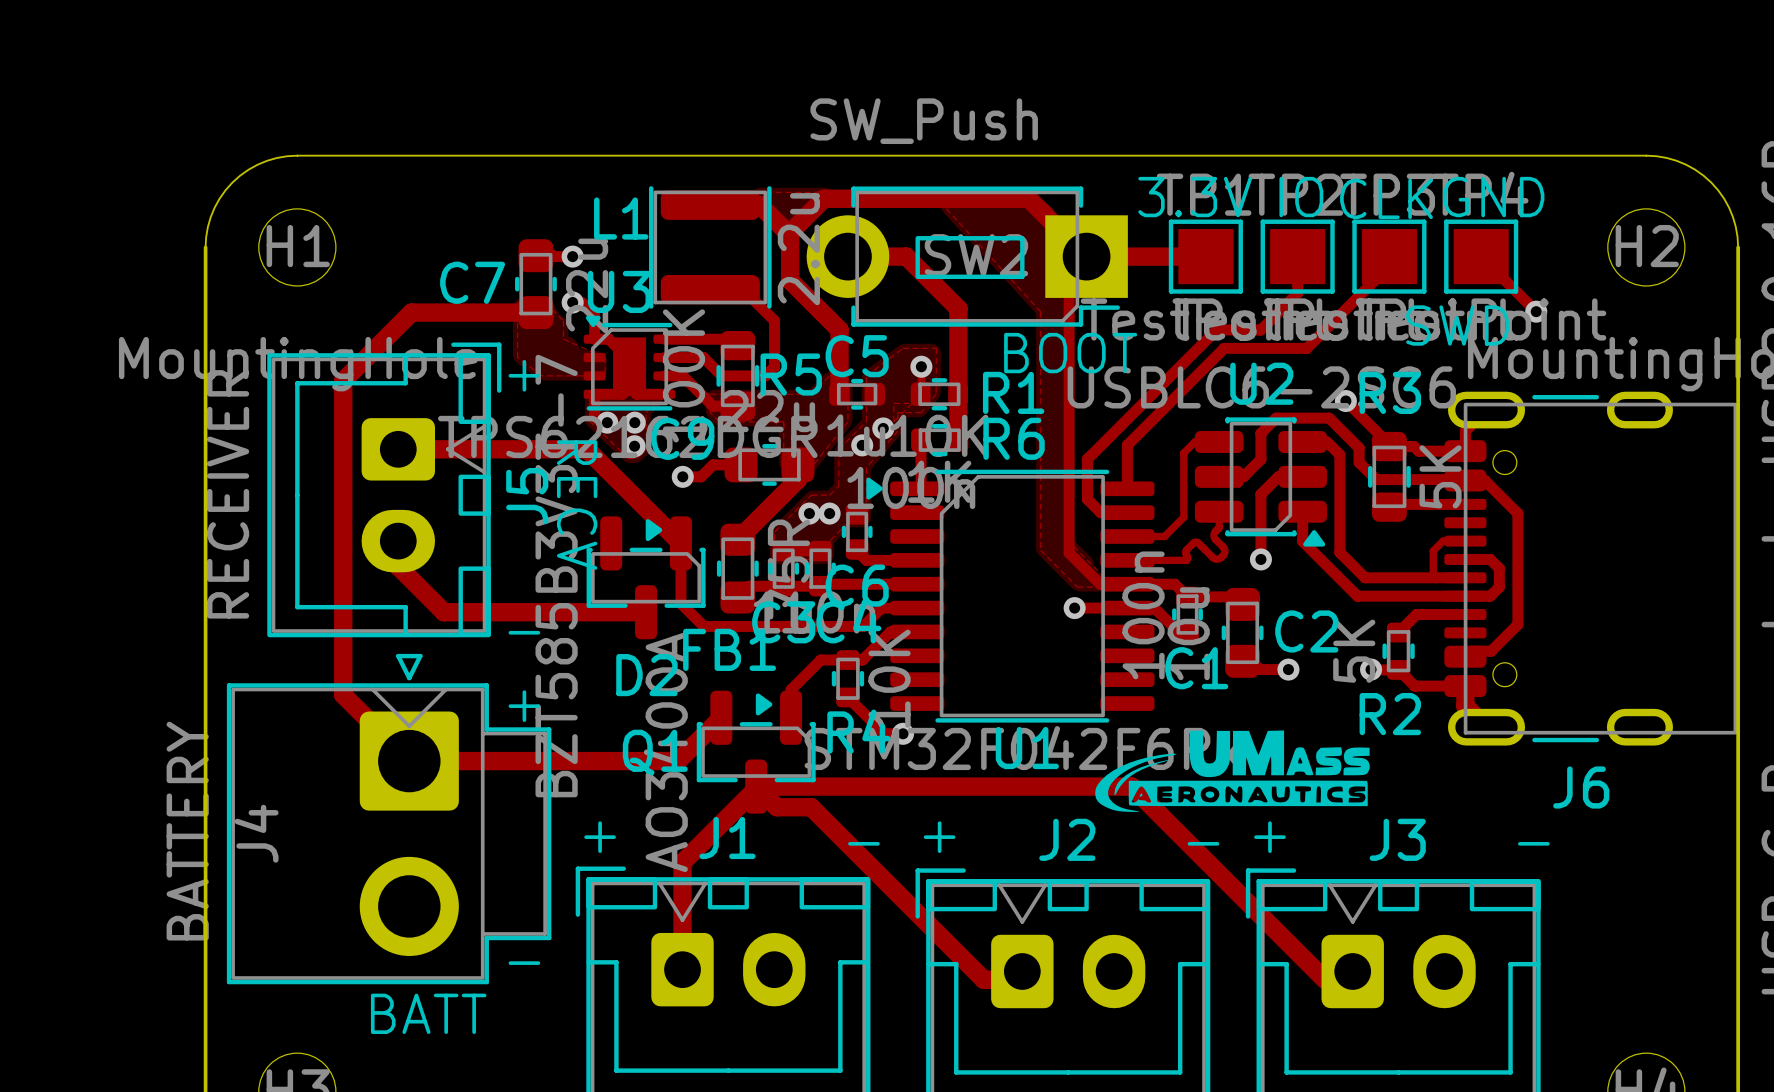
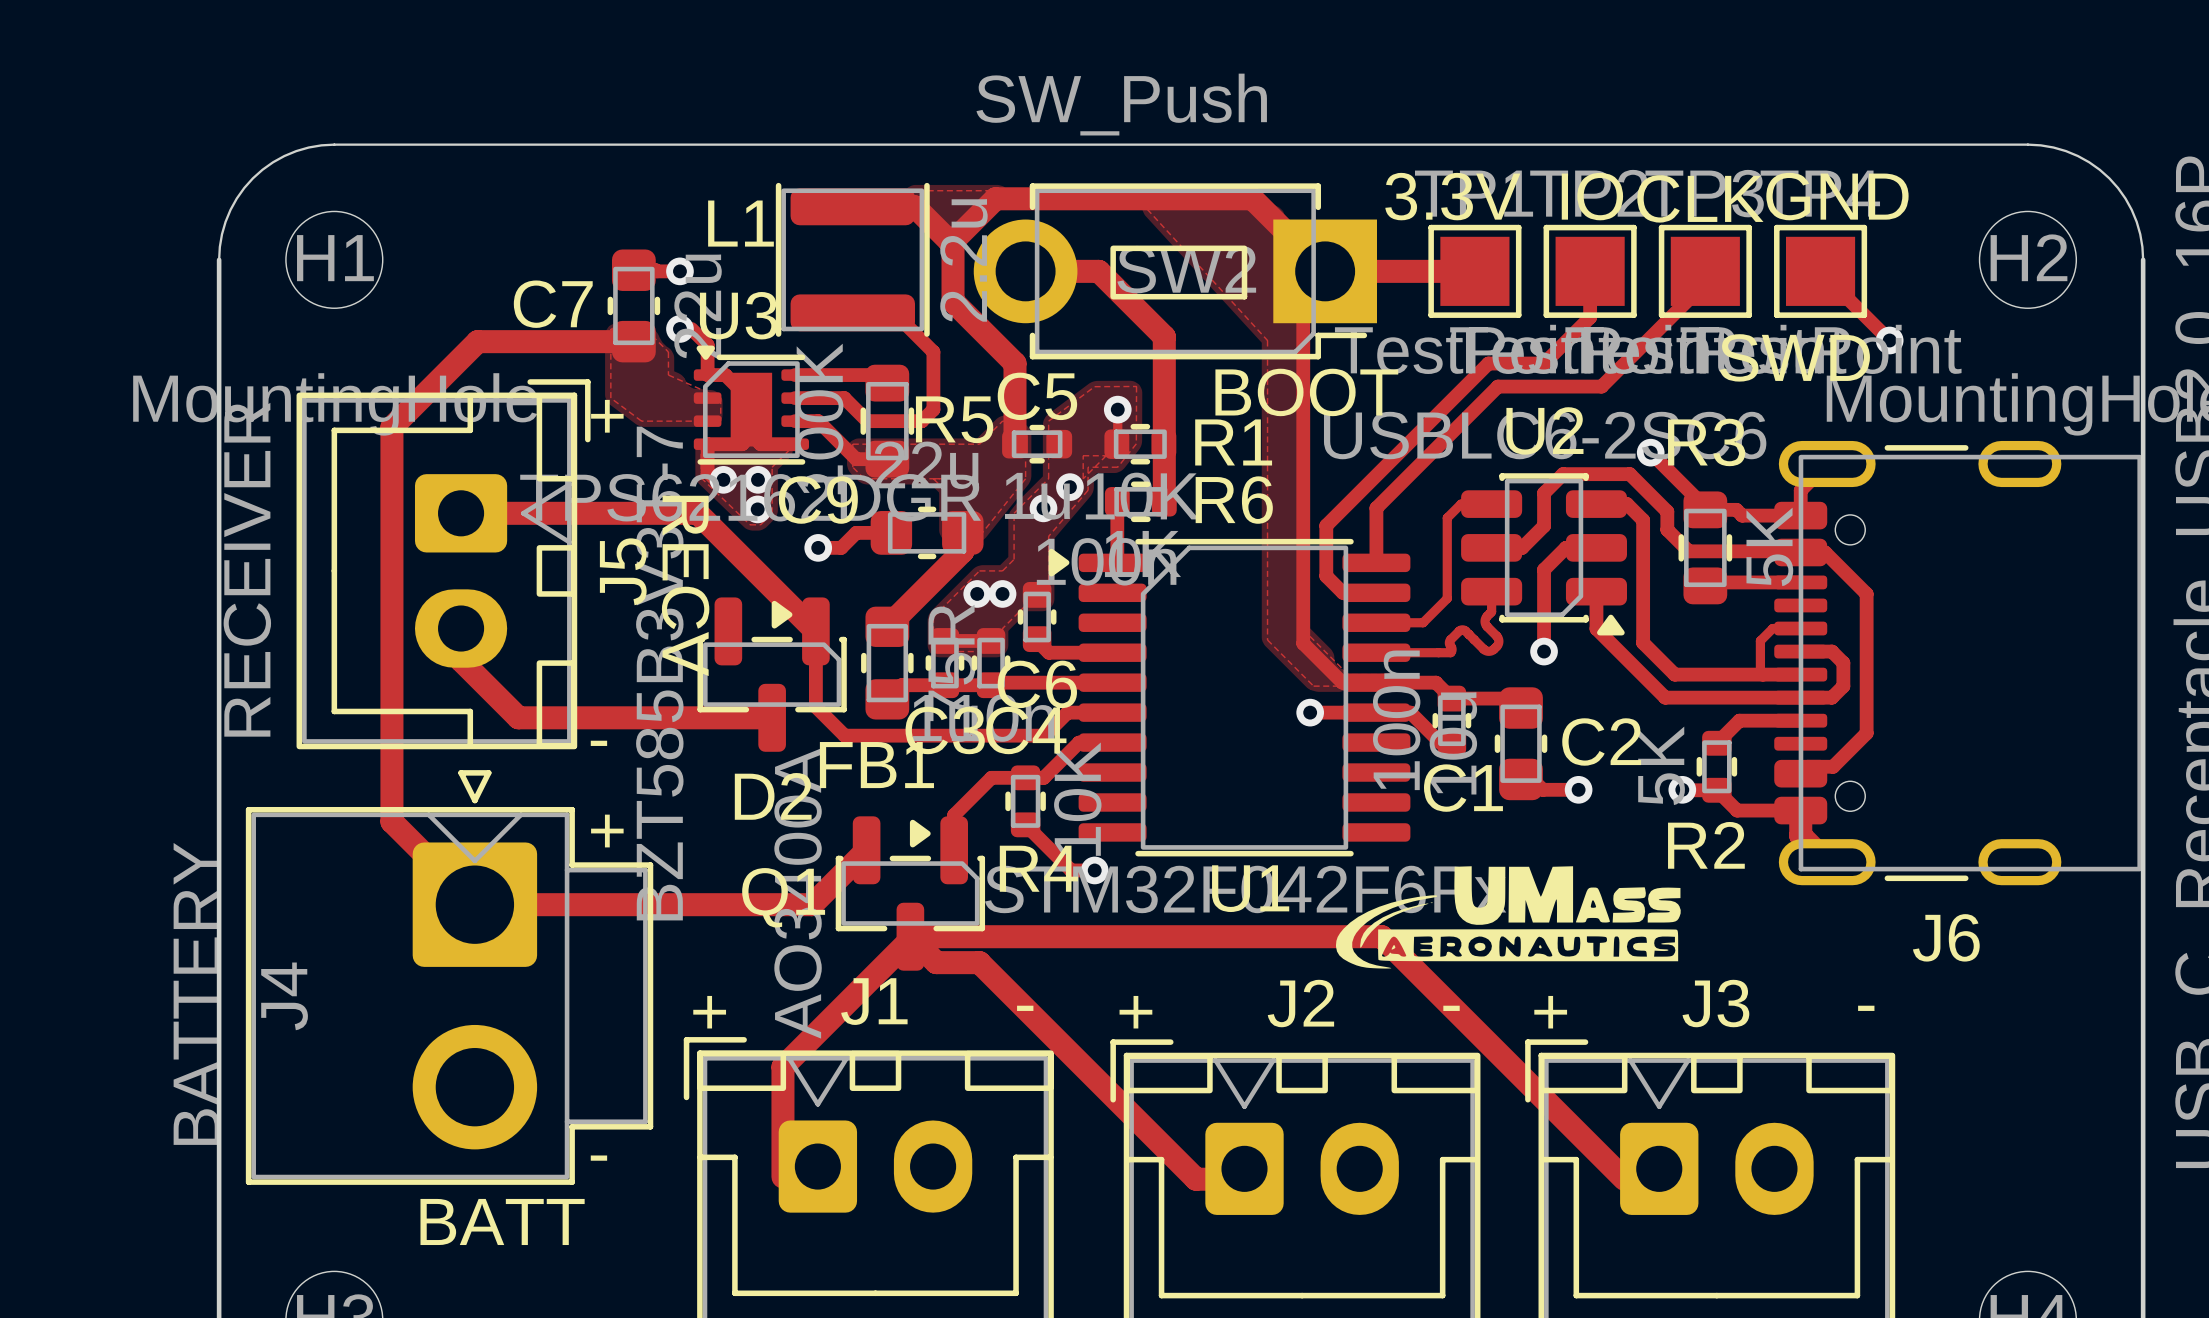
track: (682, 862) (682, 950) -> (817, 1032) (782, 1067) (782, 1176)

